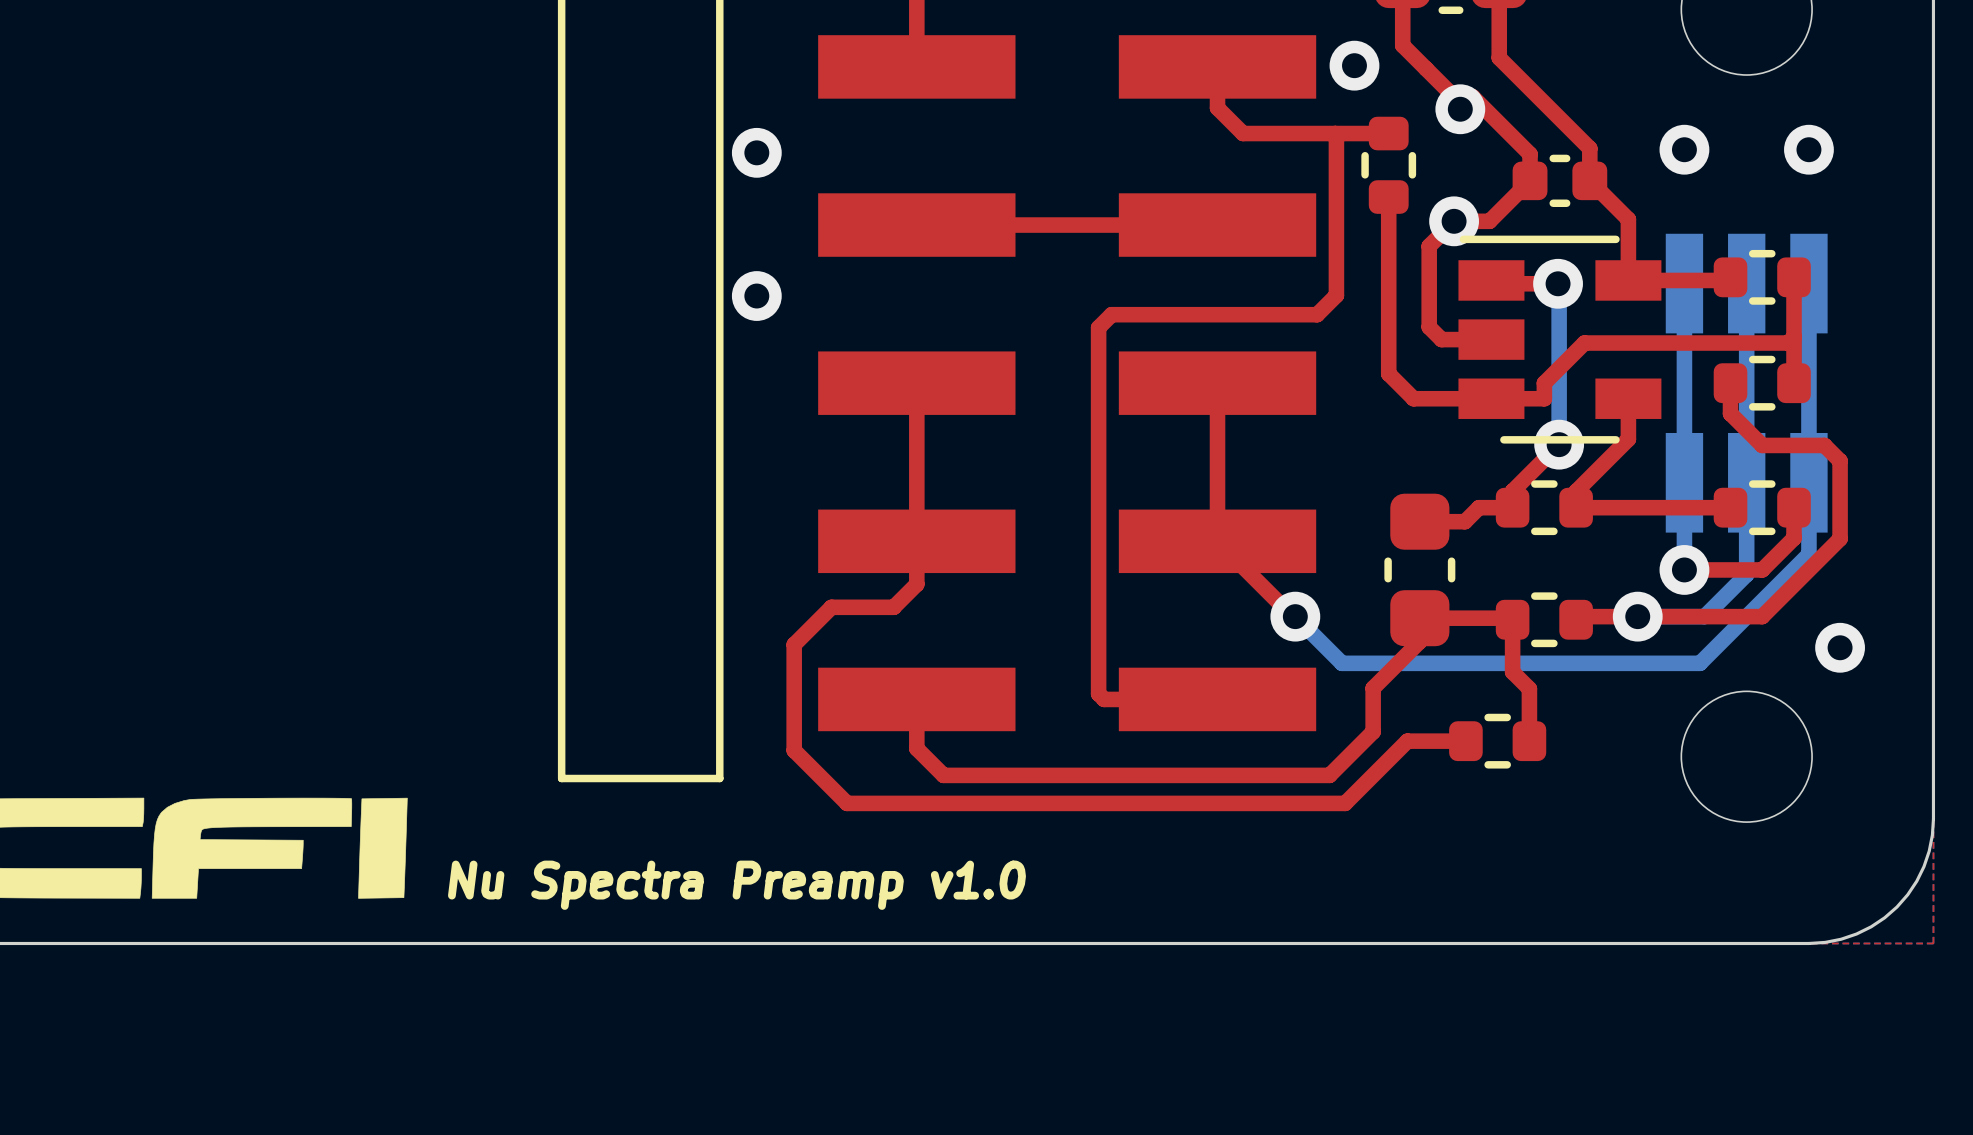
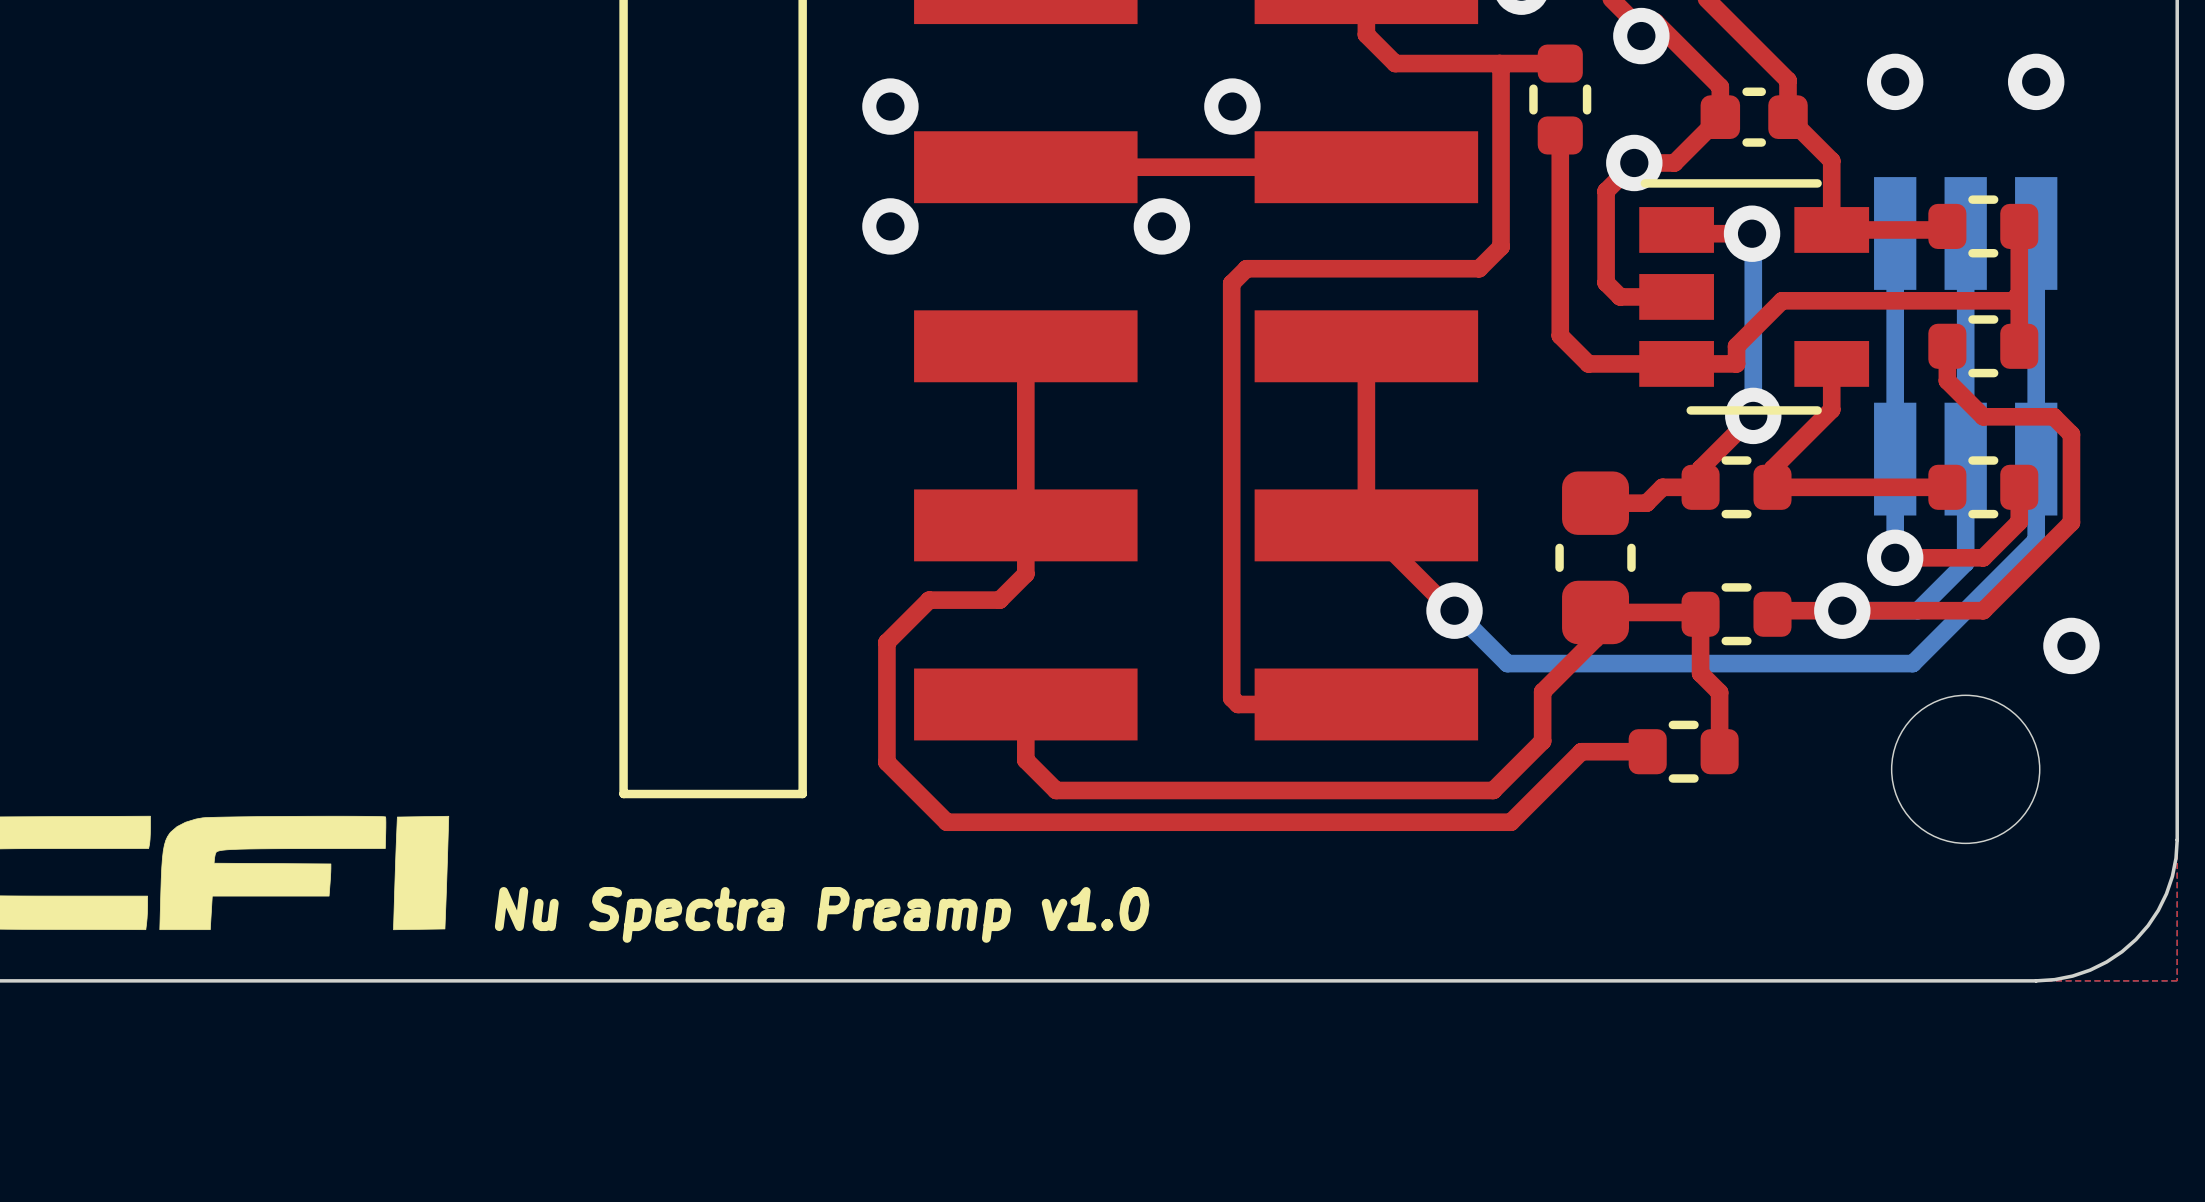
via position: (756, 152) -> (890, 106)
via: none -> (1232, 106)
via: none -> (1161, 226)
via position: (756, 296) -> (890, 226)

